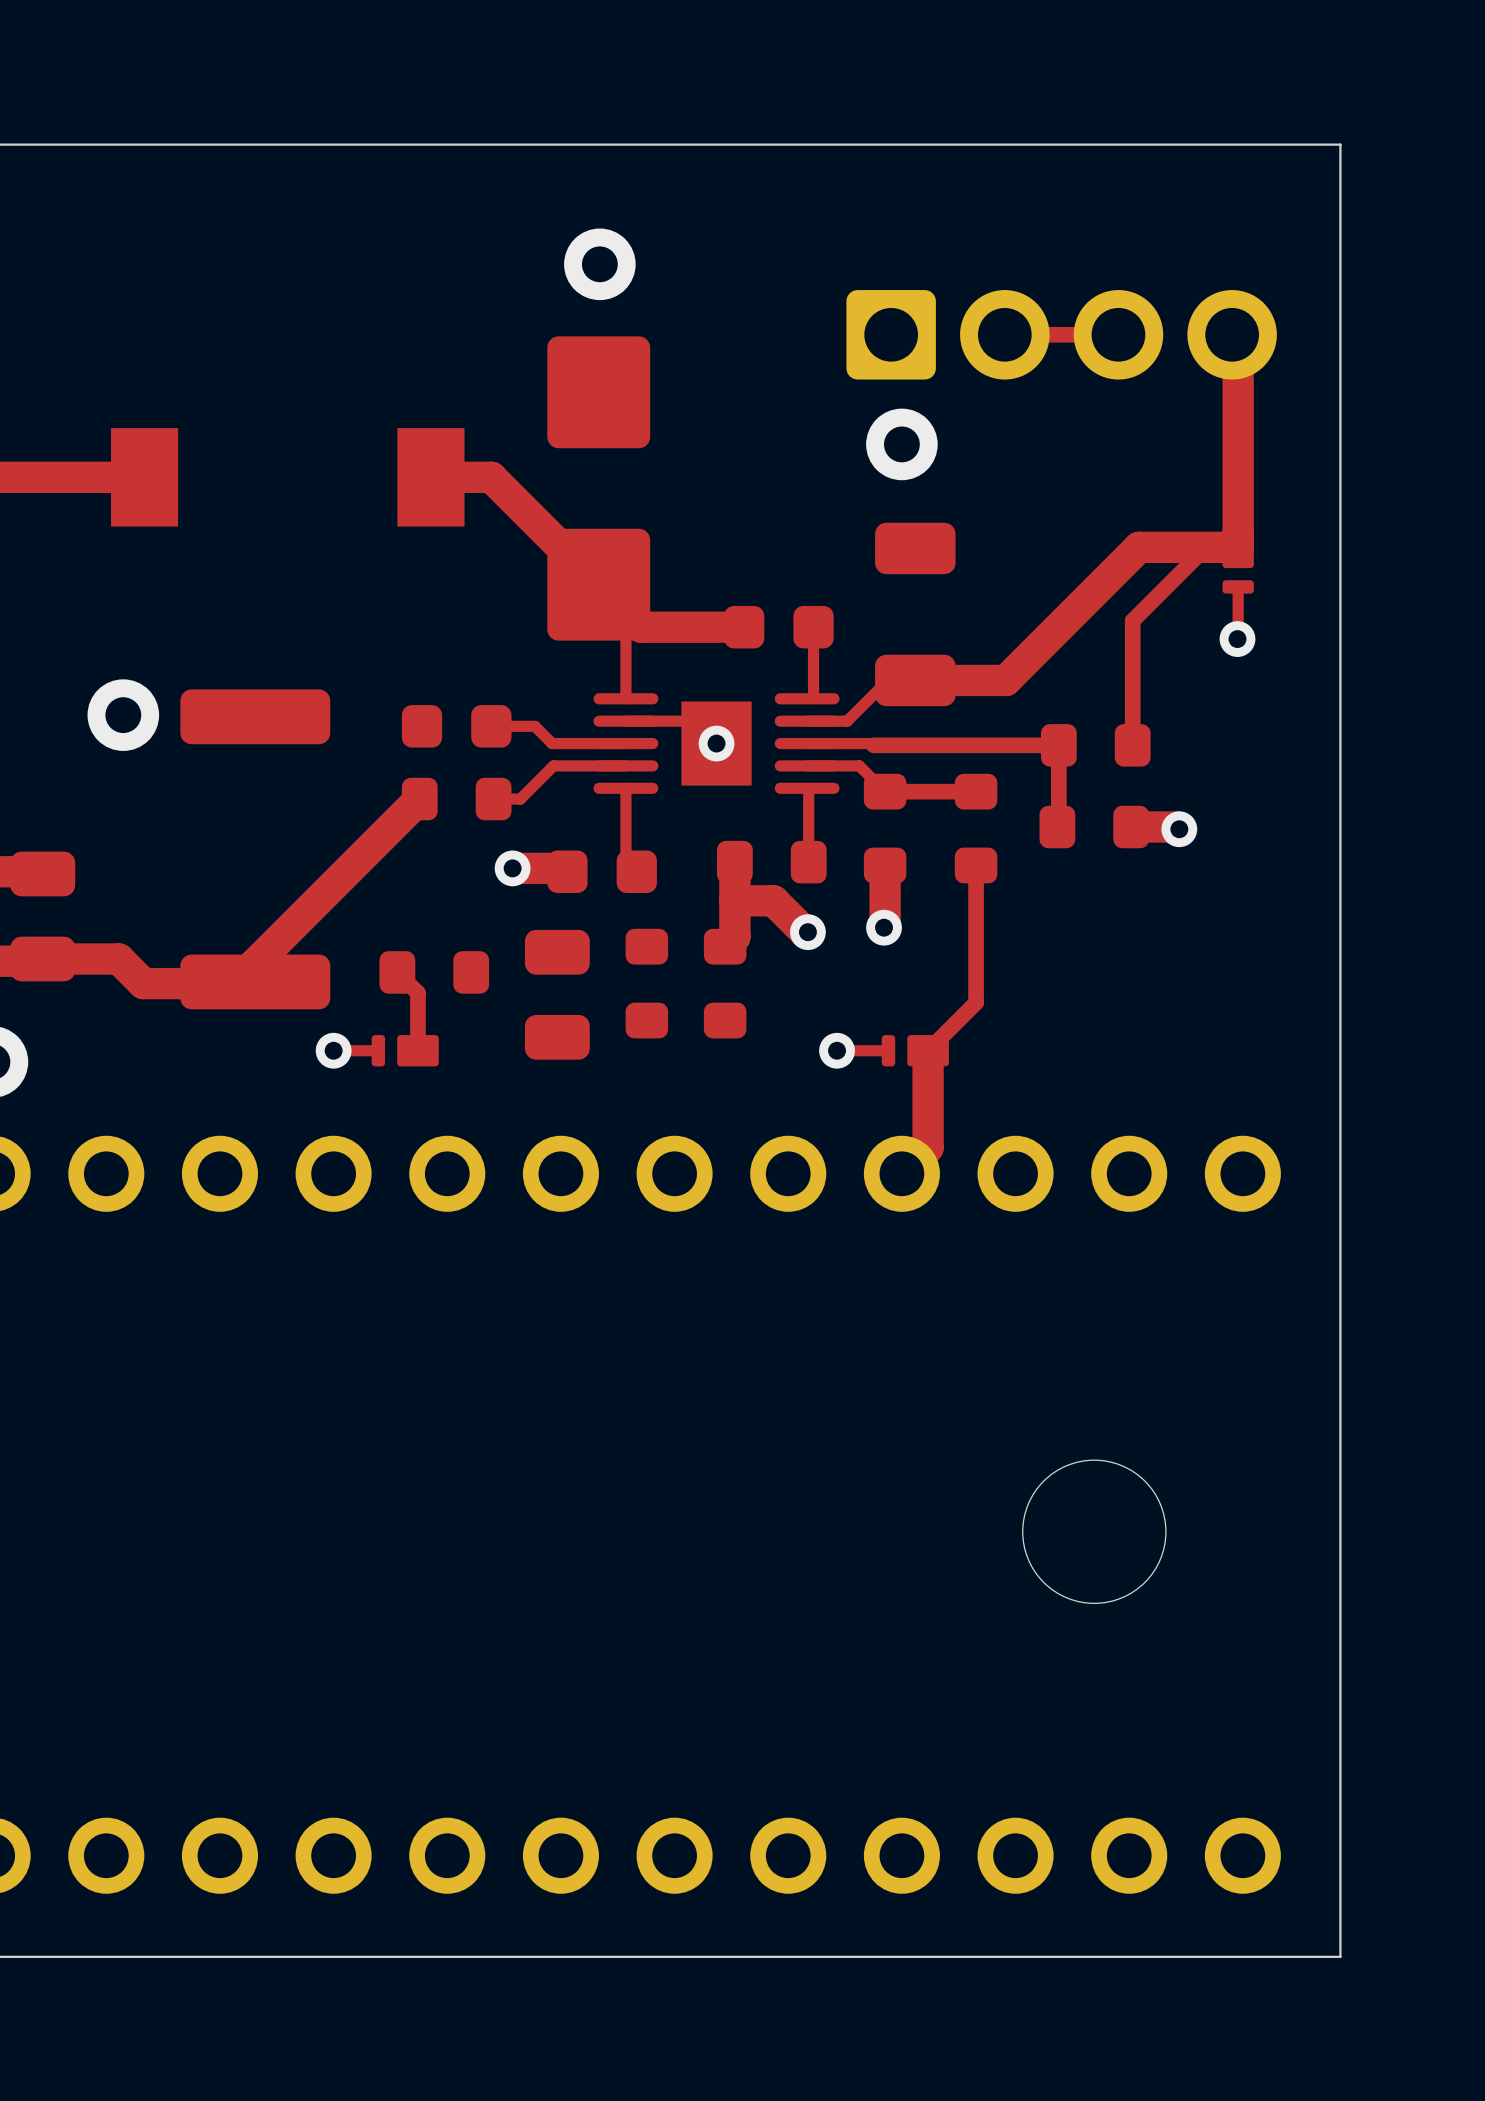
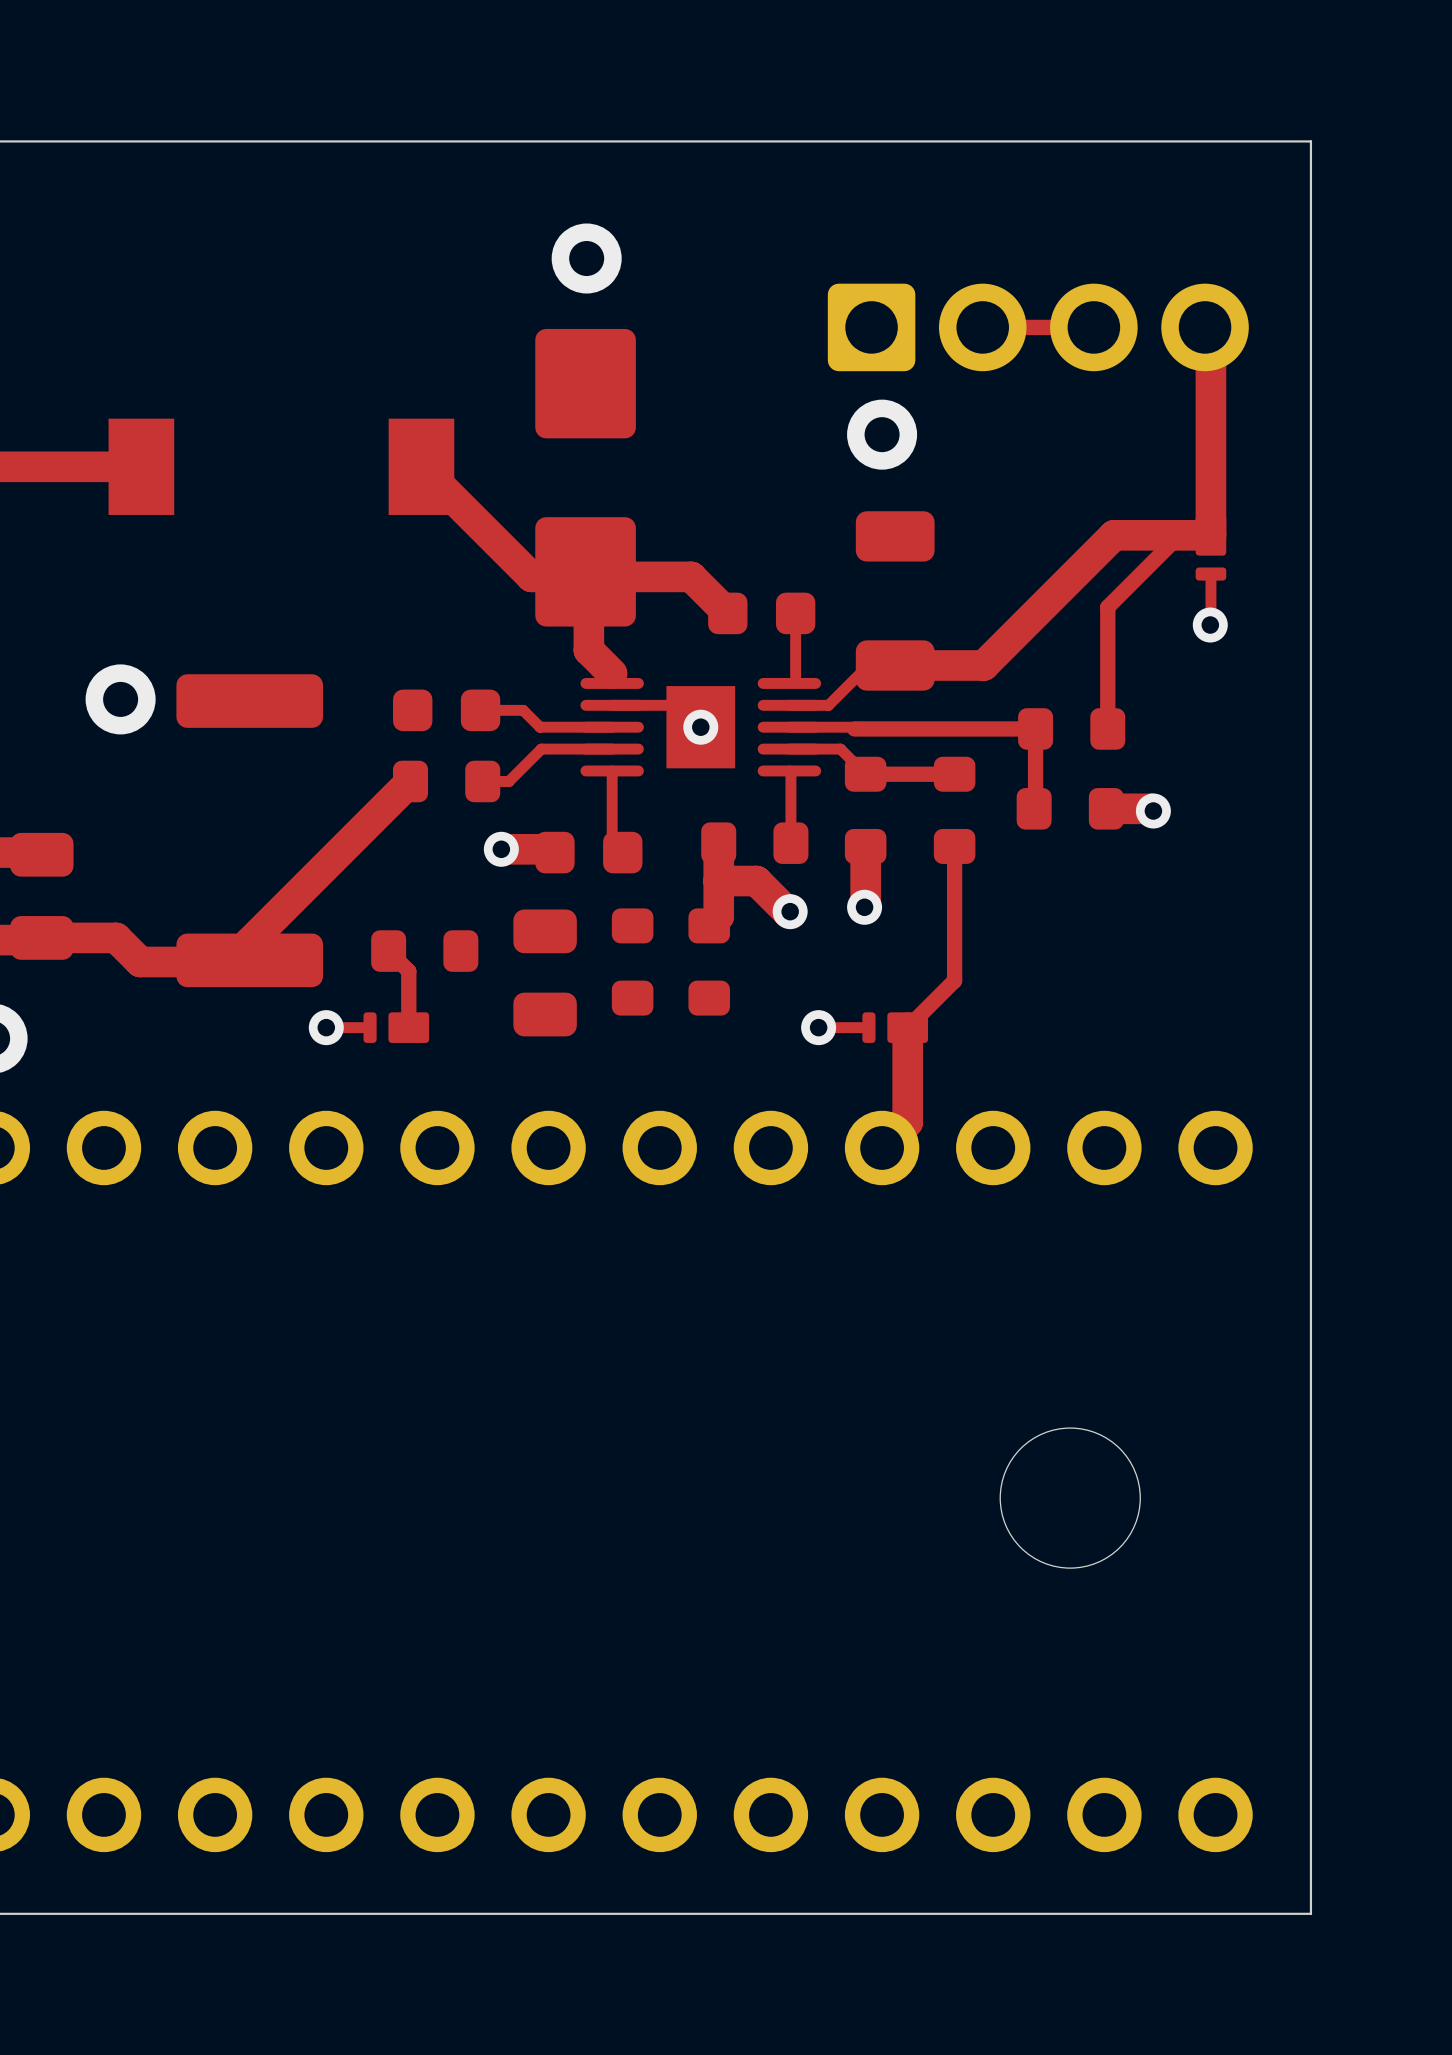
top track: (430, 477) (491, 477) (641, 627) (744, 627) -> (421, 466) (531, 576) (691, 576) (727, 613)
top track: (598, 584) (625, 611) (625, 698) -> none
top track: none -> (588, 576) (588, 650) (612, 673)

